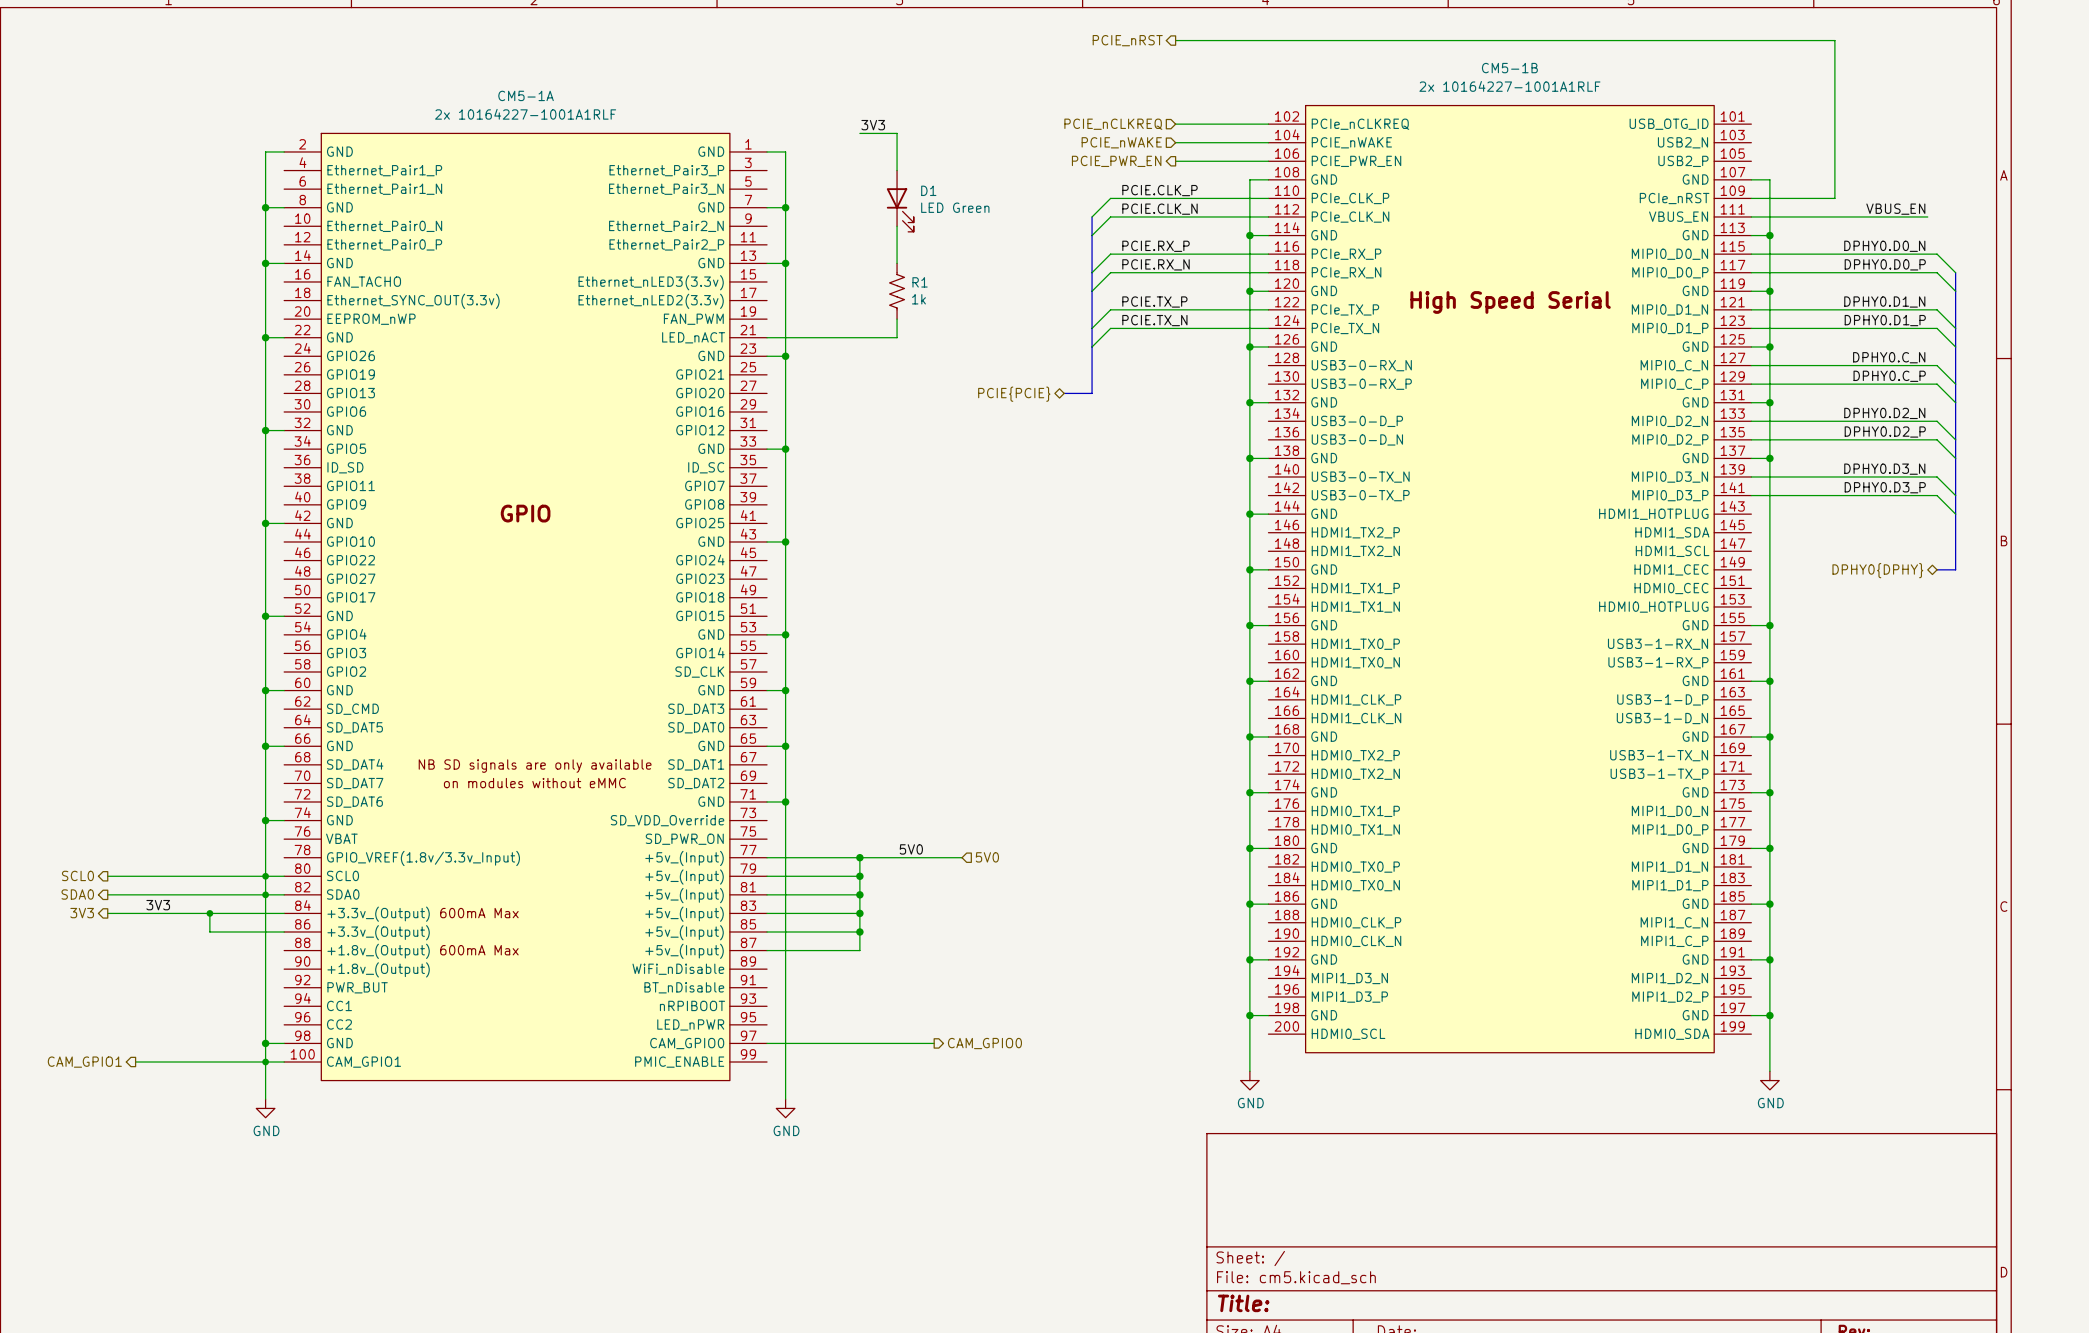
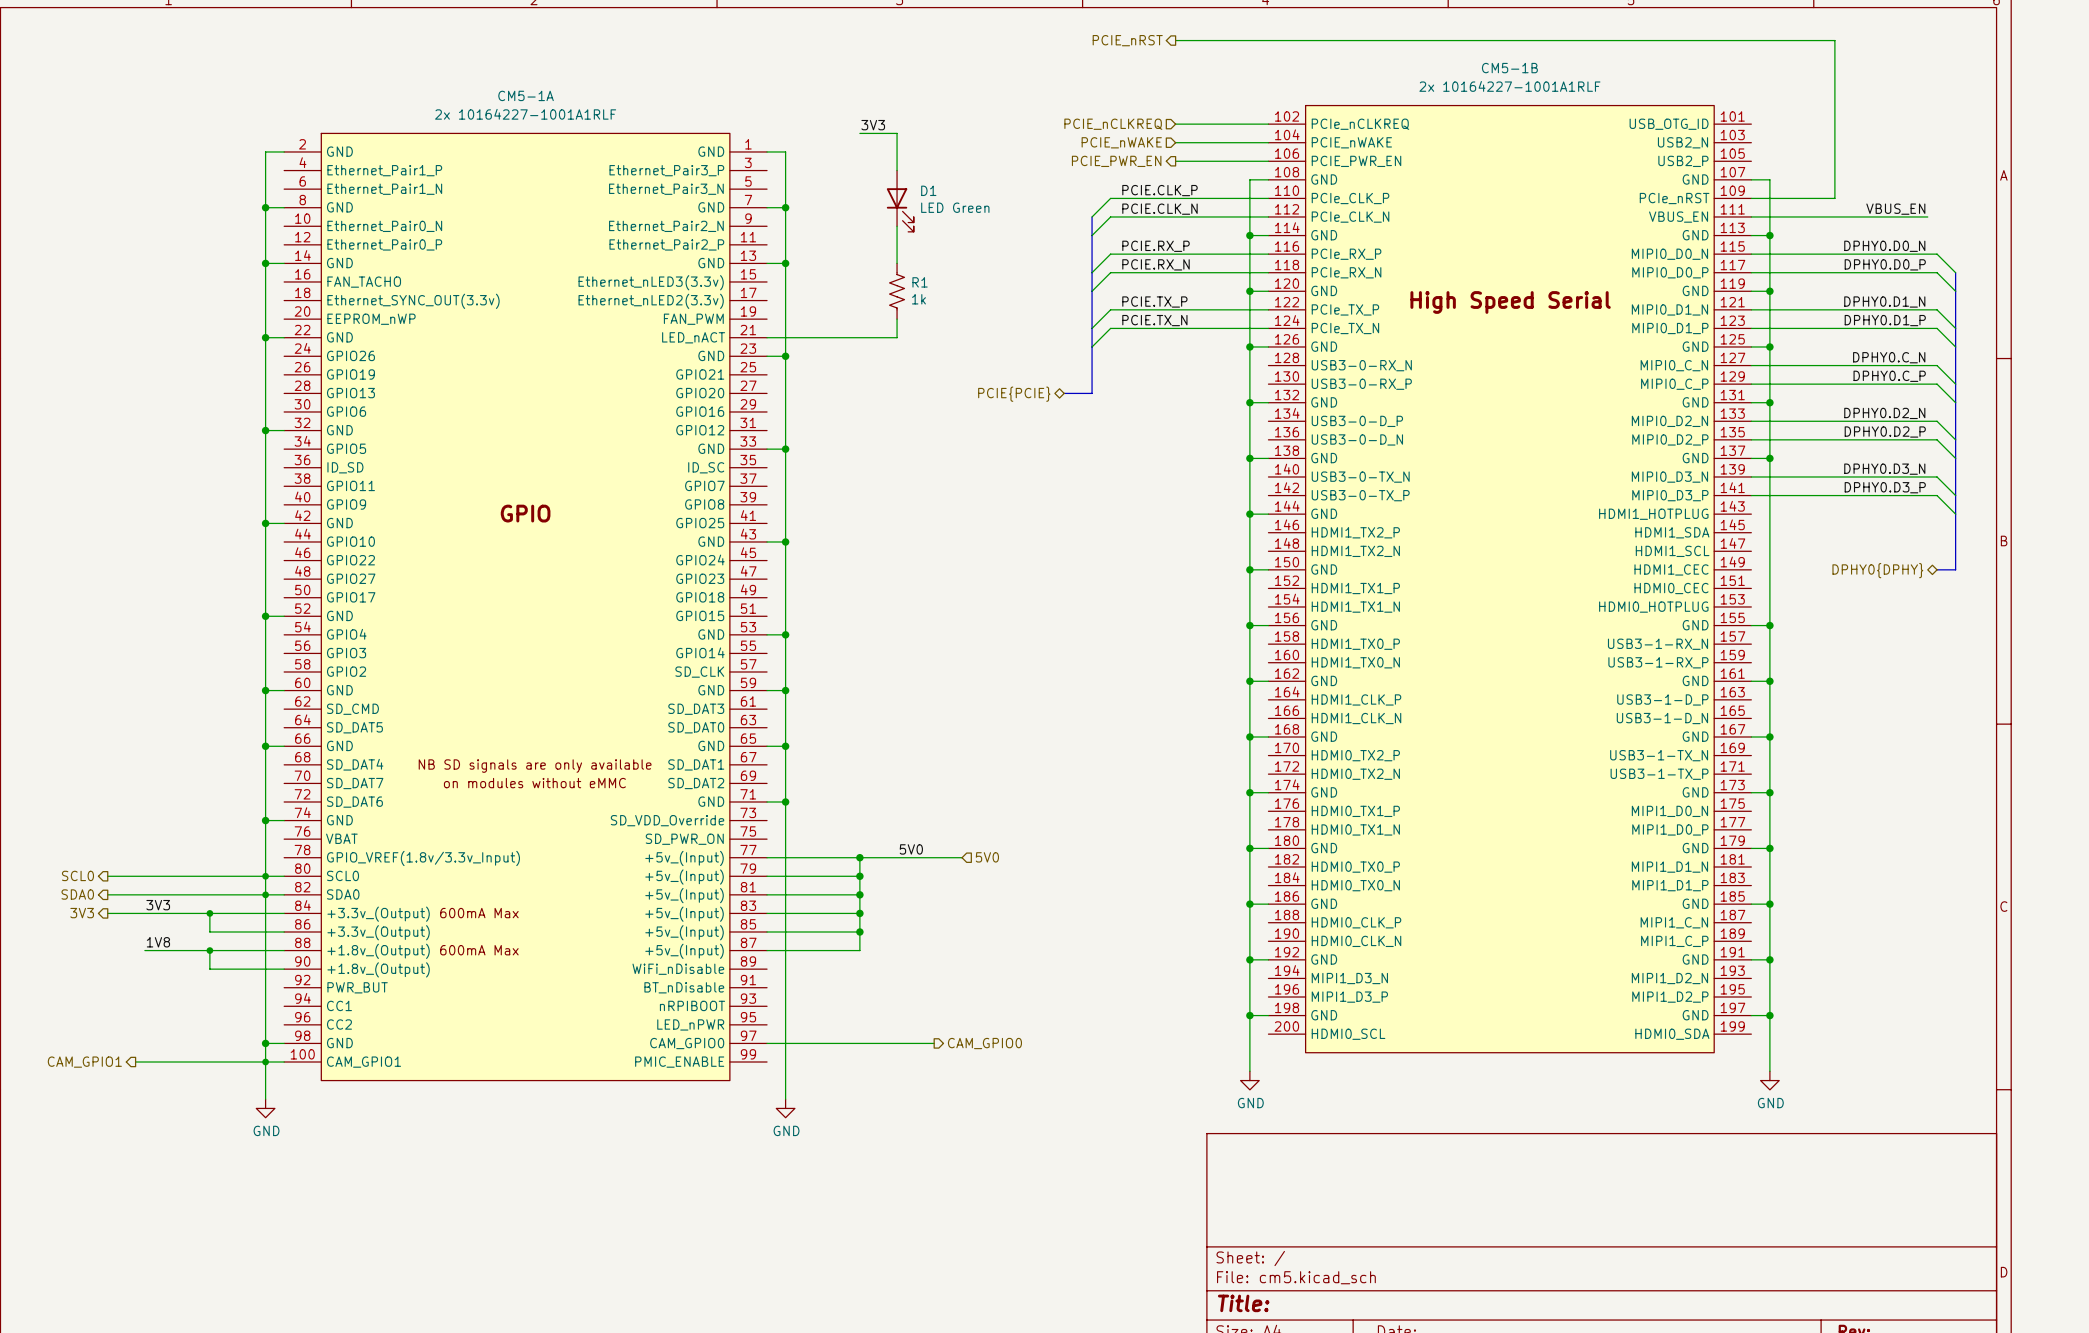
label: none -> 1V8 (158, 942)
wire: none -> (144, 950) (284, 950)
wire: none -> (209, 950) (209, 969) (284, 969)
junction: none -> (209, 950)

